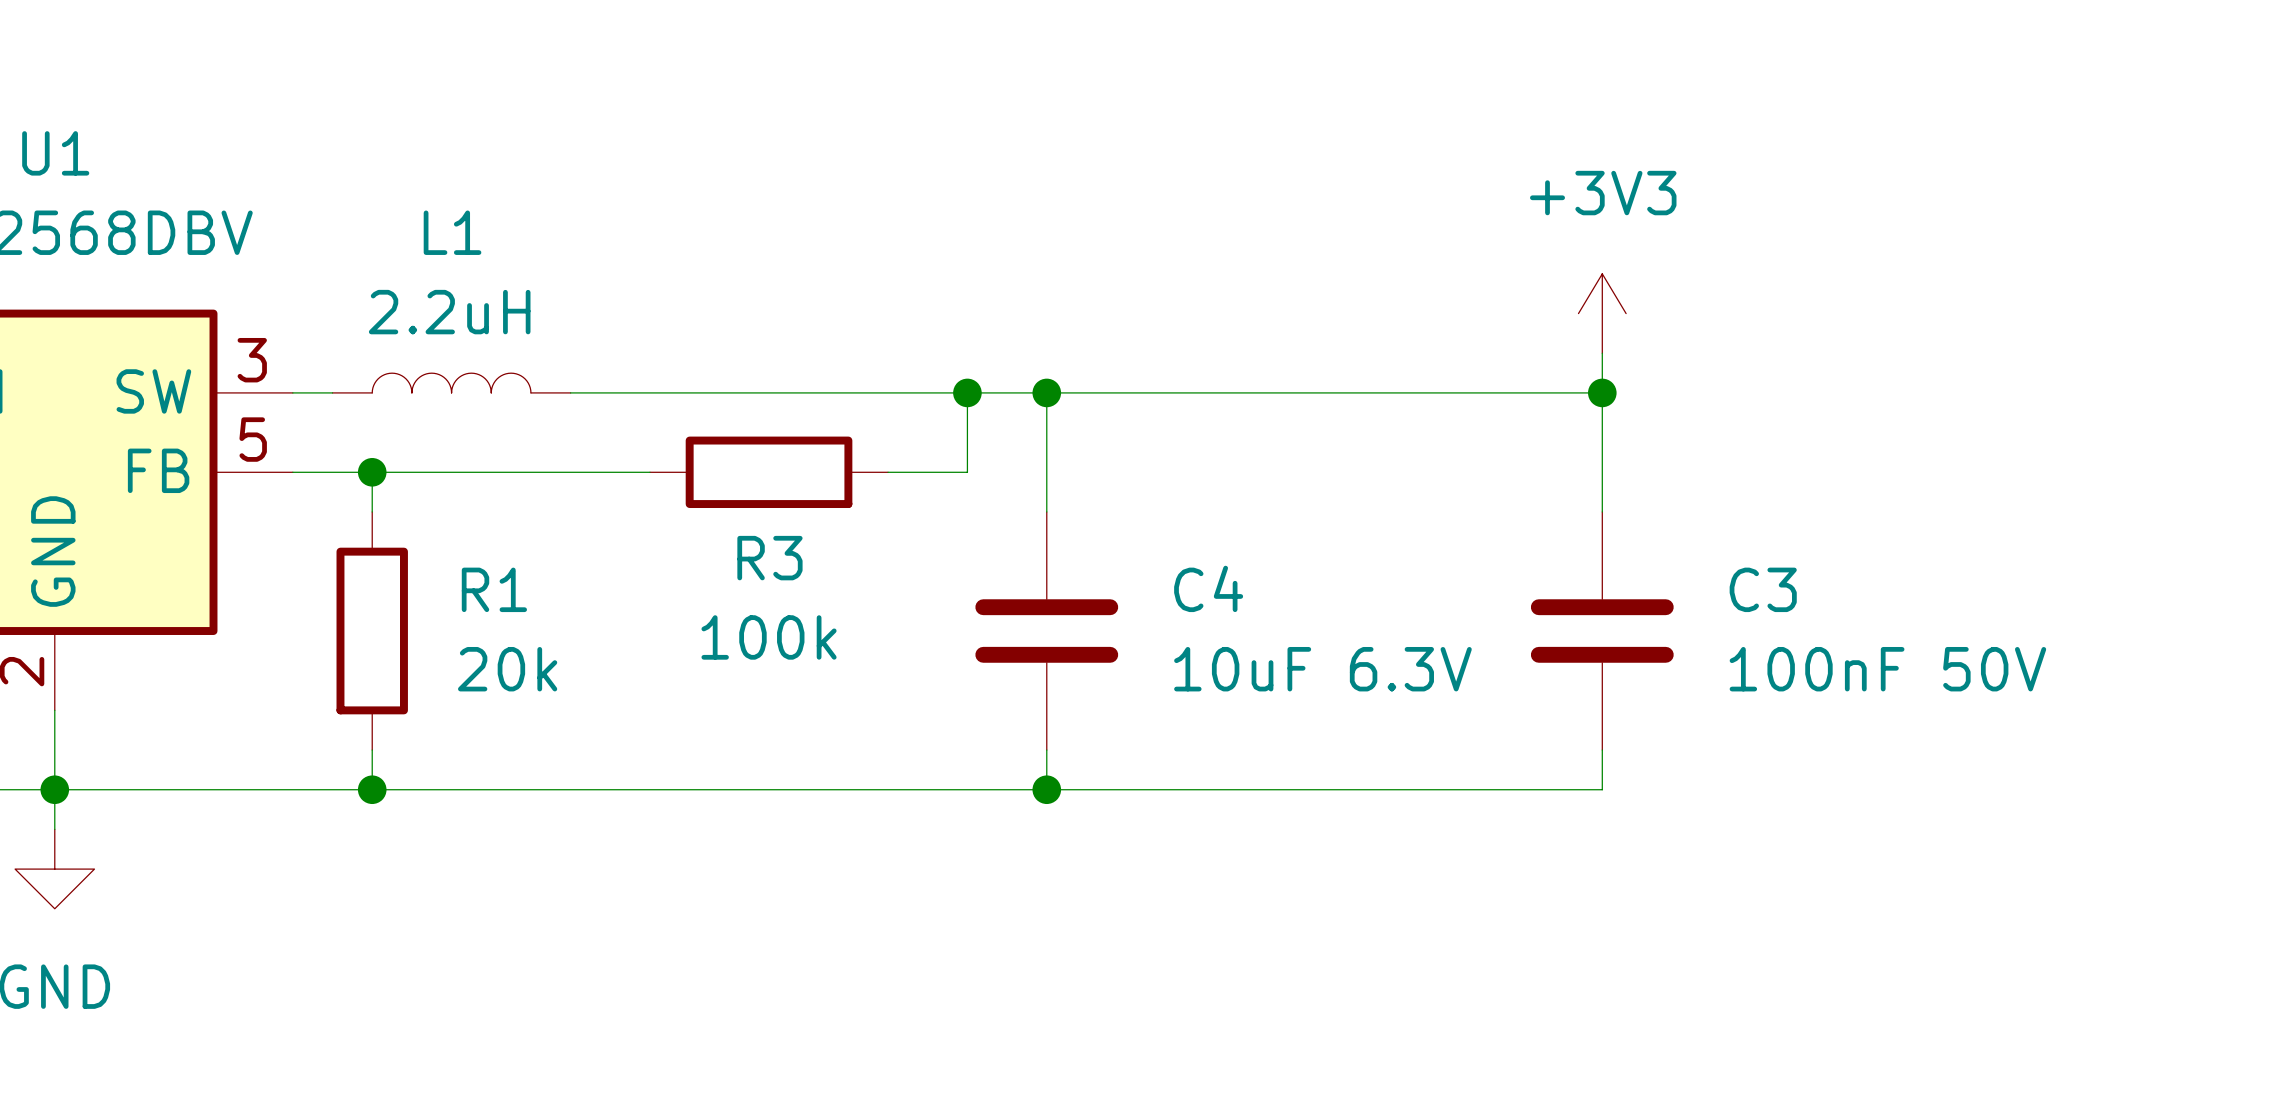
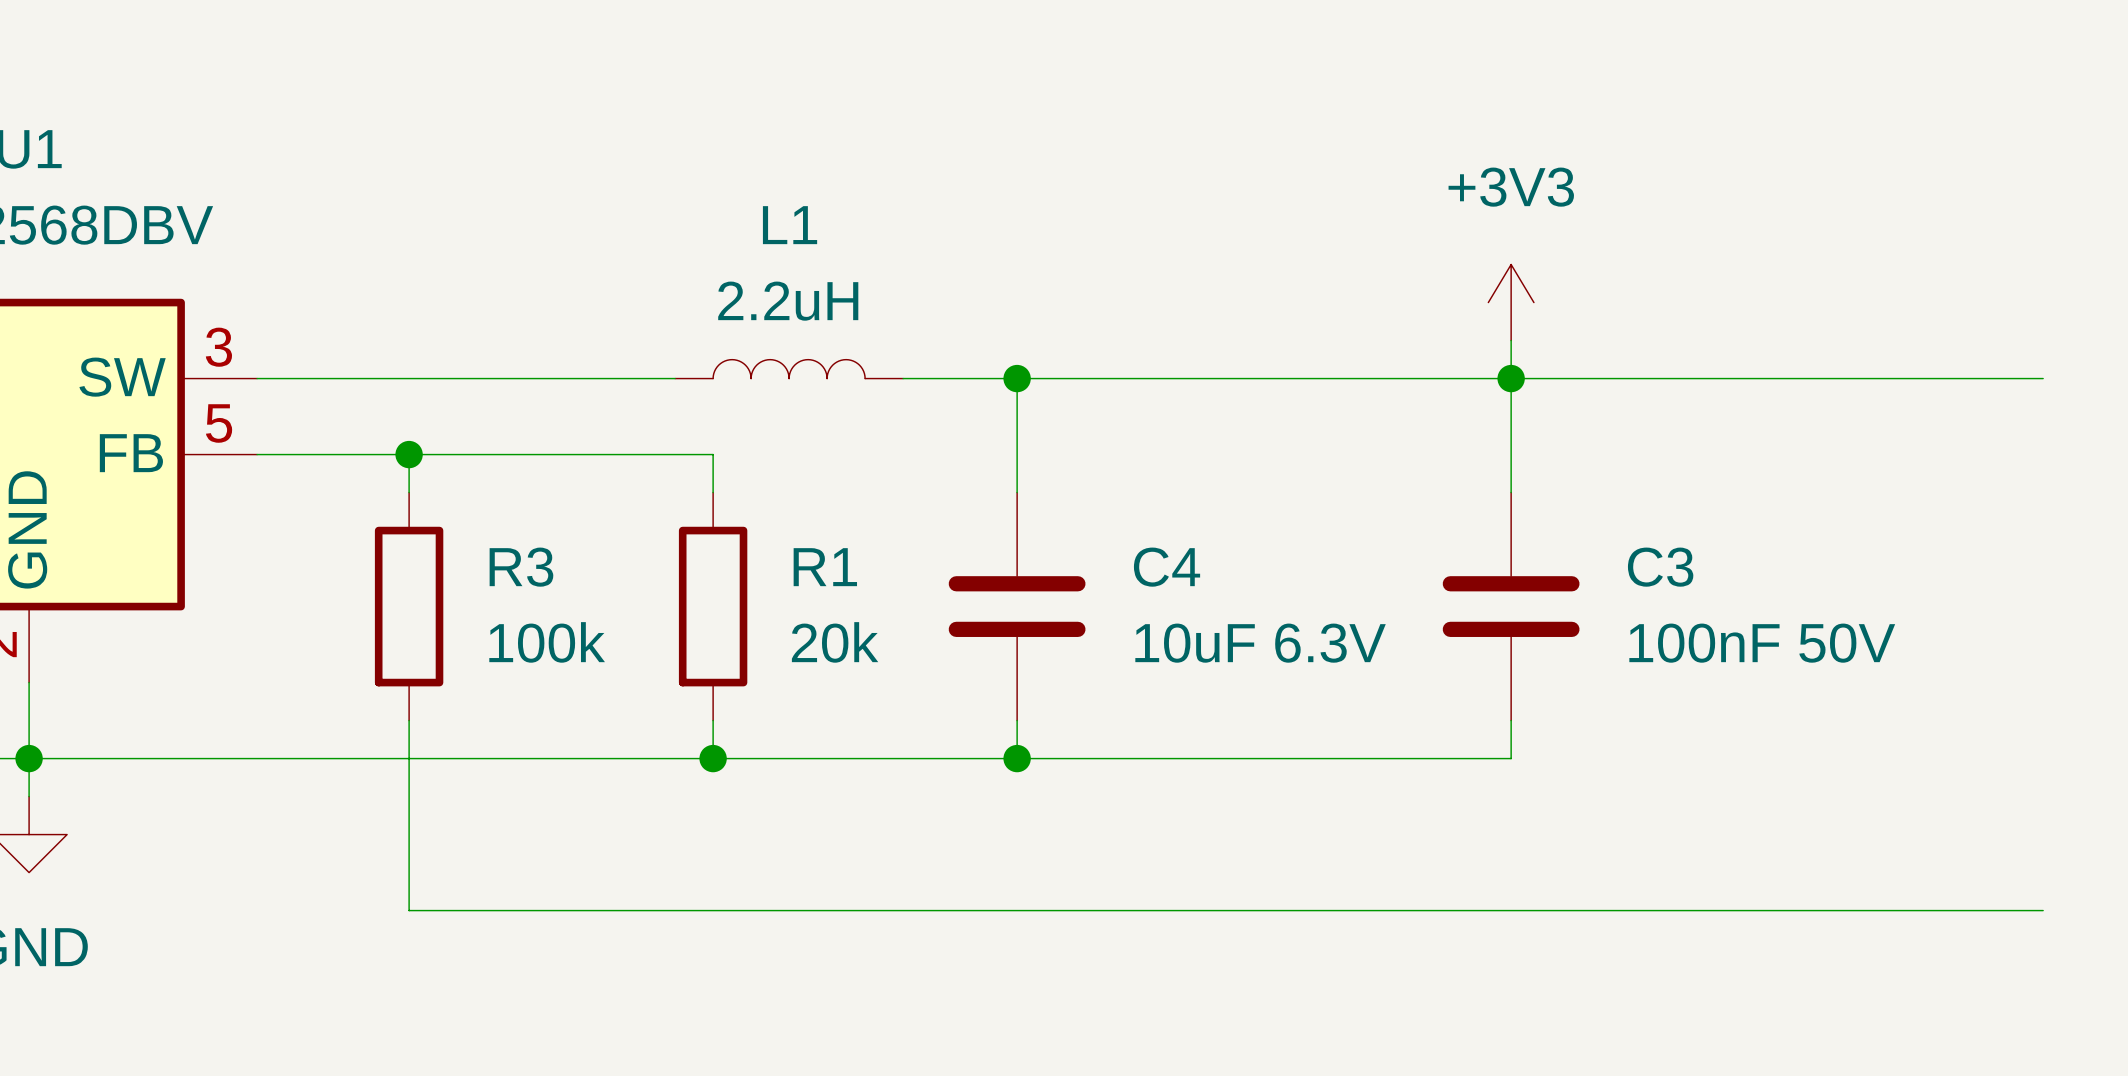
L1 position: (451, 383) -> (789, 369)
wire: none -> (295, 378) (523, 378)
wire: (729, 392) (967, 392) (967, 472) (888, 472) -> none
junction: (967, 392) -> none
wire: (1046, 392) (1046, 511) -> (1017, 378) (1017, 492)
junction position: (1046, 392) -> (1017, 378)
wire: none -> (1511, 378) (2043, 378)
wire: (372, 472) (372, 511) -> (409, 454) (409, 492)
junction position: (372, 472) -> (409, 454)
wire: none -> (599, 454) (713, 454) (713, 492)
R3 rotation: 0° (769, 472) -> 90° clockwise (409, 606)
R3 position: (769, 472) -> (409, 606)
R3 name position: R3 (769, 558) -> R3 (521, 567)
R1 position: (372, 631) -> (713, 606)
C4 position: (1046, 631) -> (1017, 606)
R3 value position: 100k (769, 637) -> 100k (547, 642)
wire: (372, 750) (372, 789) -> (713, 720) (713, 758)
wire: none -> (409, 720) (409, 910) (2043, 910)
wire: (1046, 750) (1046, 789) -> (1017, 720) (1017, 758)
junction: (372, 789) -> none
junction: none -> (713, 758)
junction position: (1046, 789) -> (1017, 758)

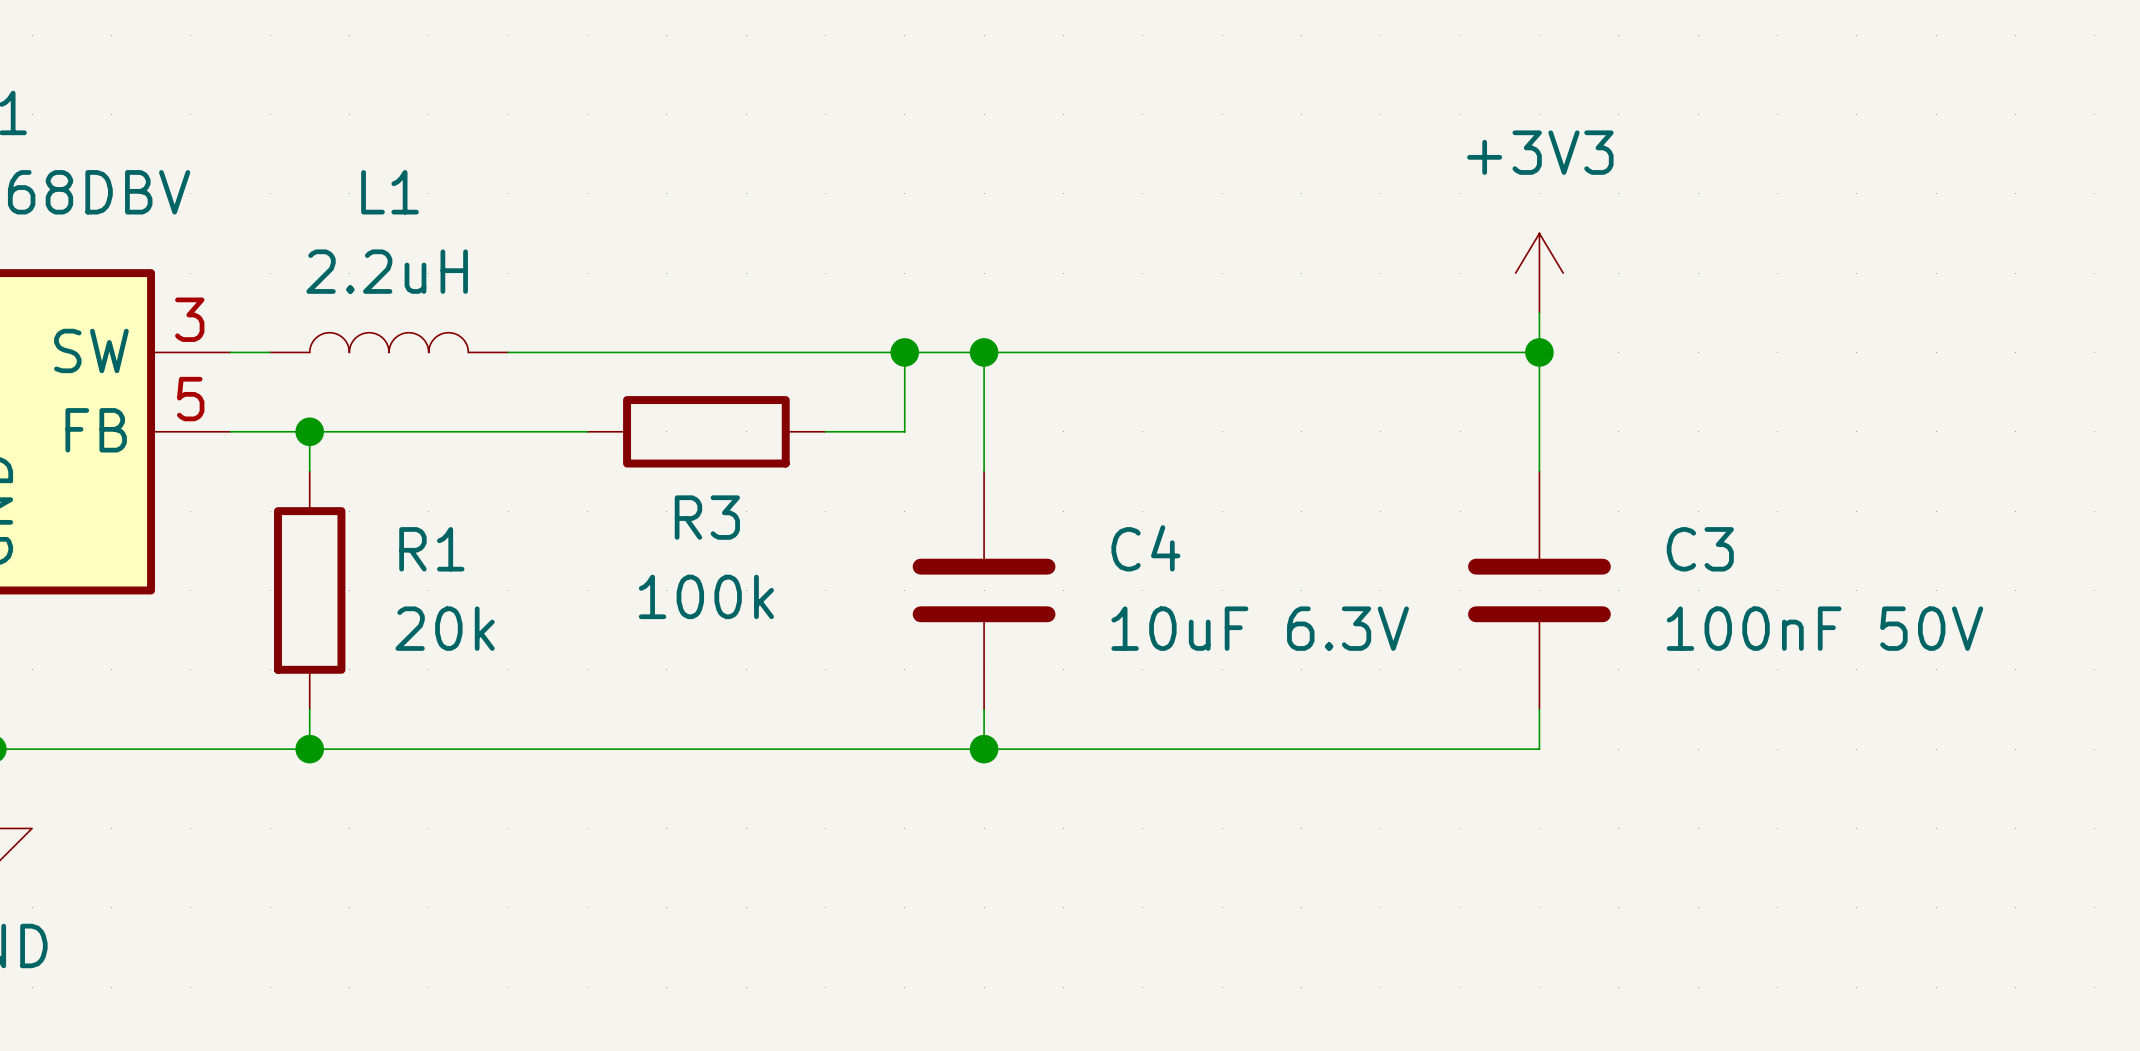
L1 position: (789, 369) -> (389, 342)
wire: (295, 378) (523, 378) -> none
wire: none -> (666, 352) (904, 352) (904, 431) (825, 431)
junction: none -> (904, 352)
wire: (1017, 378) (1017, 492) -> (984, 352) (984, 471)
junction position: (1017, 378) -> (984, 352)
wire: (1511, 378) (2043, 378) -> none
wire: (409, 454) (409, 492) -> (309, 431) (309, 471)
junction position: (409, 454) -> (309, 431)
wire: (599, 454) (713, 454) (713, 492) -> none
R3 rotation: 0° (409, 606) -> 90° clockwise (706, 431)
R3 position: (409, 606) -> (706, 431)
R1 position: (713, 606) -> (309, 590)
C4 position: (1017, 606) -> (984, 590)
wire: (409, 720) (409, 910) (2043, 910) -> none
wire: (713, 720) (713, 758) -> (309, 709) (309, 749)
wire: (1017, 720) (1017, 758) -> (984, 709) (984, 749)
junction: none -> (309, 749)
junction: (713, 758) -> none
junction position: (1017, 758) -> (984, 749)

